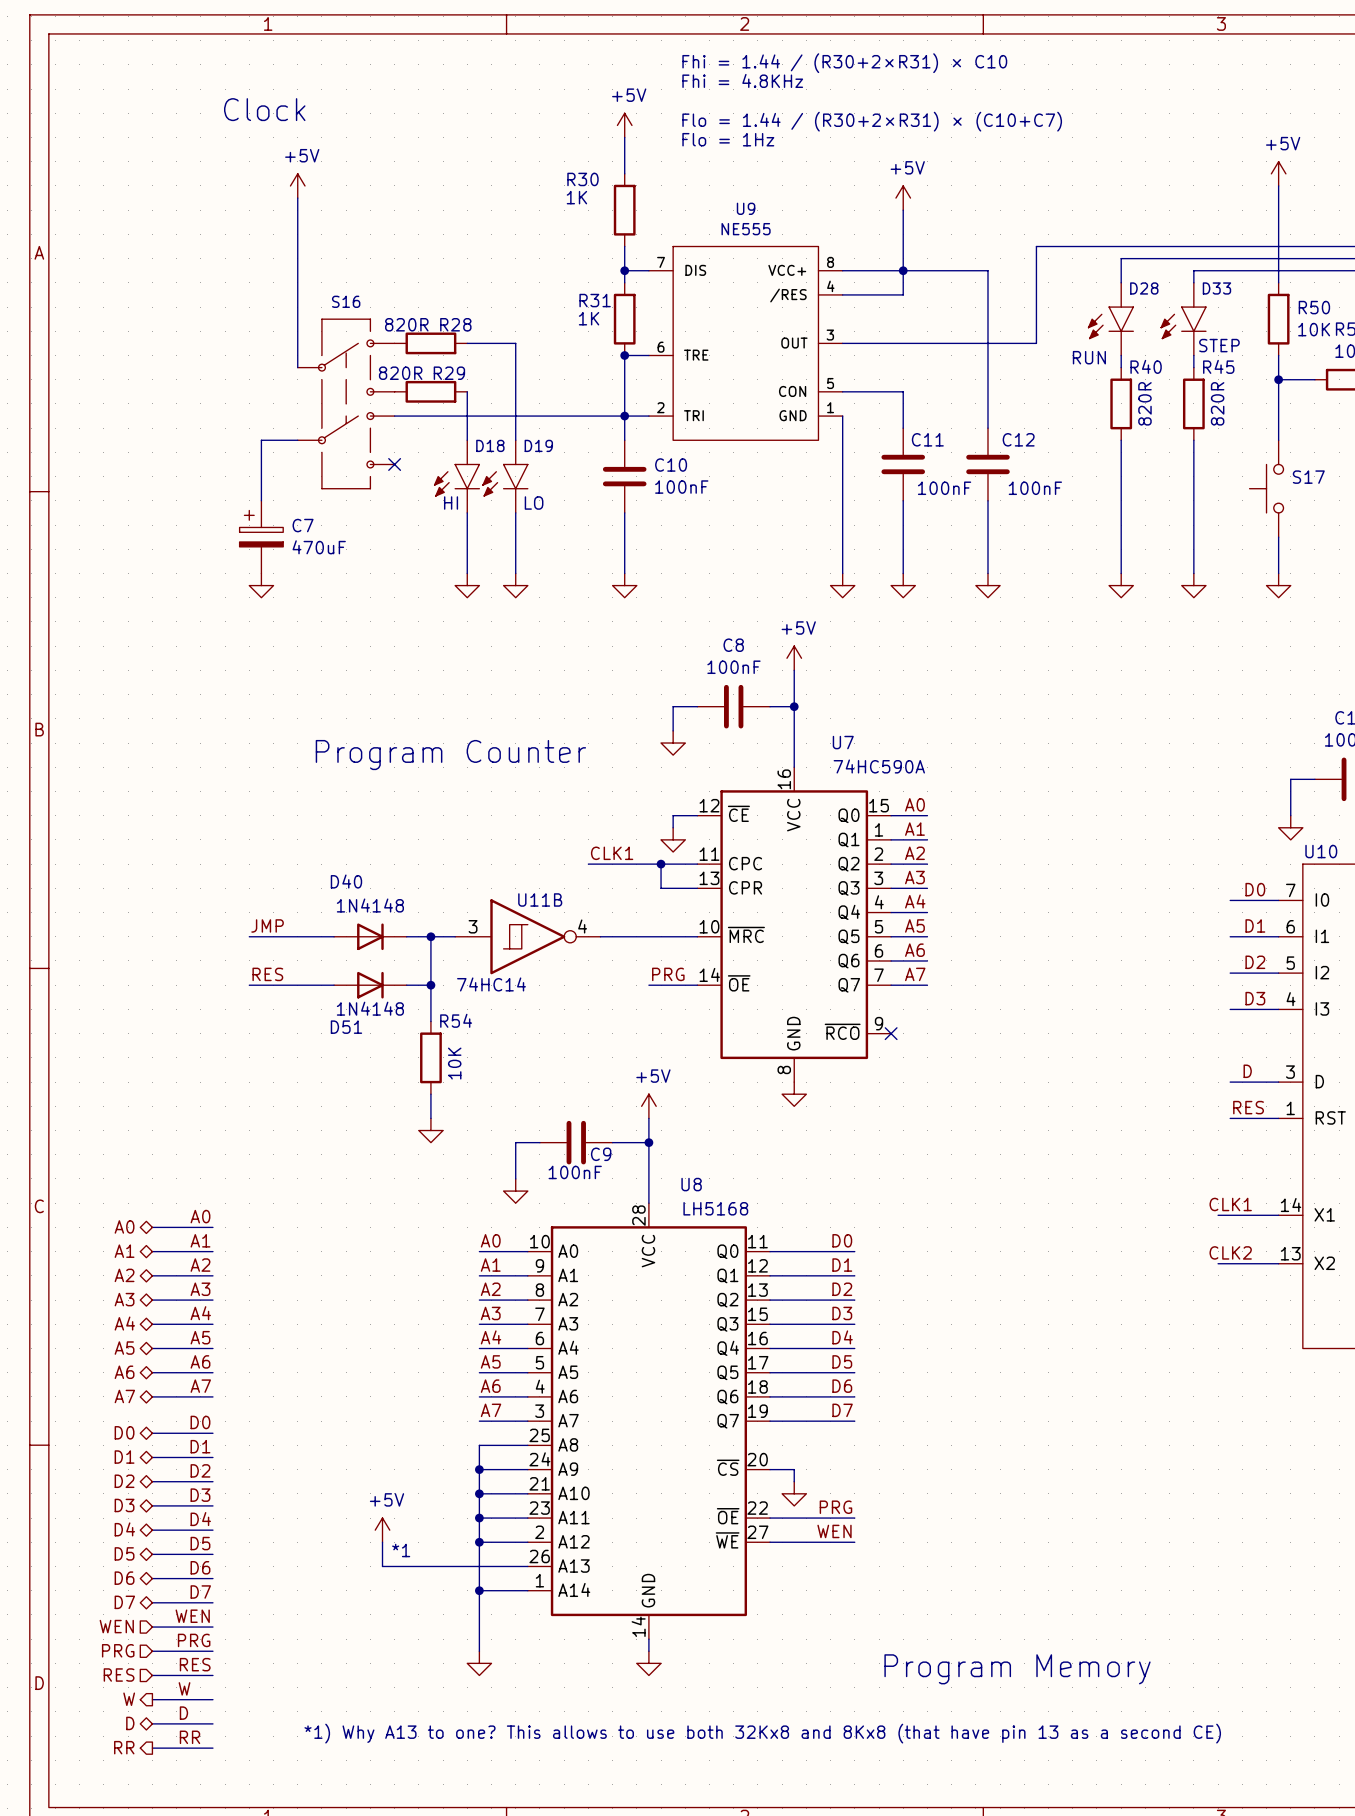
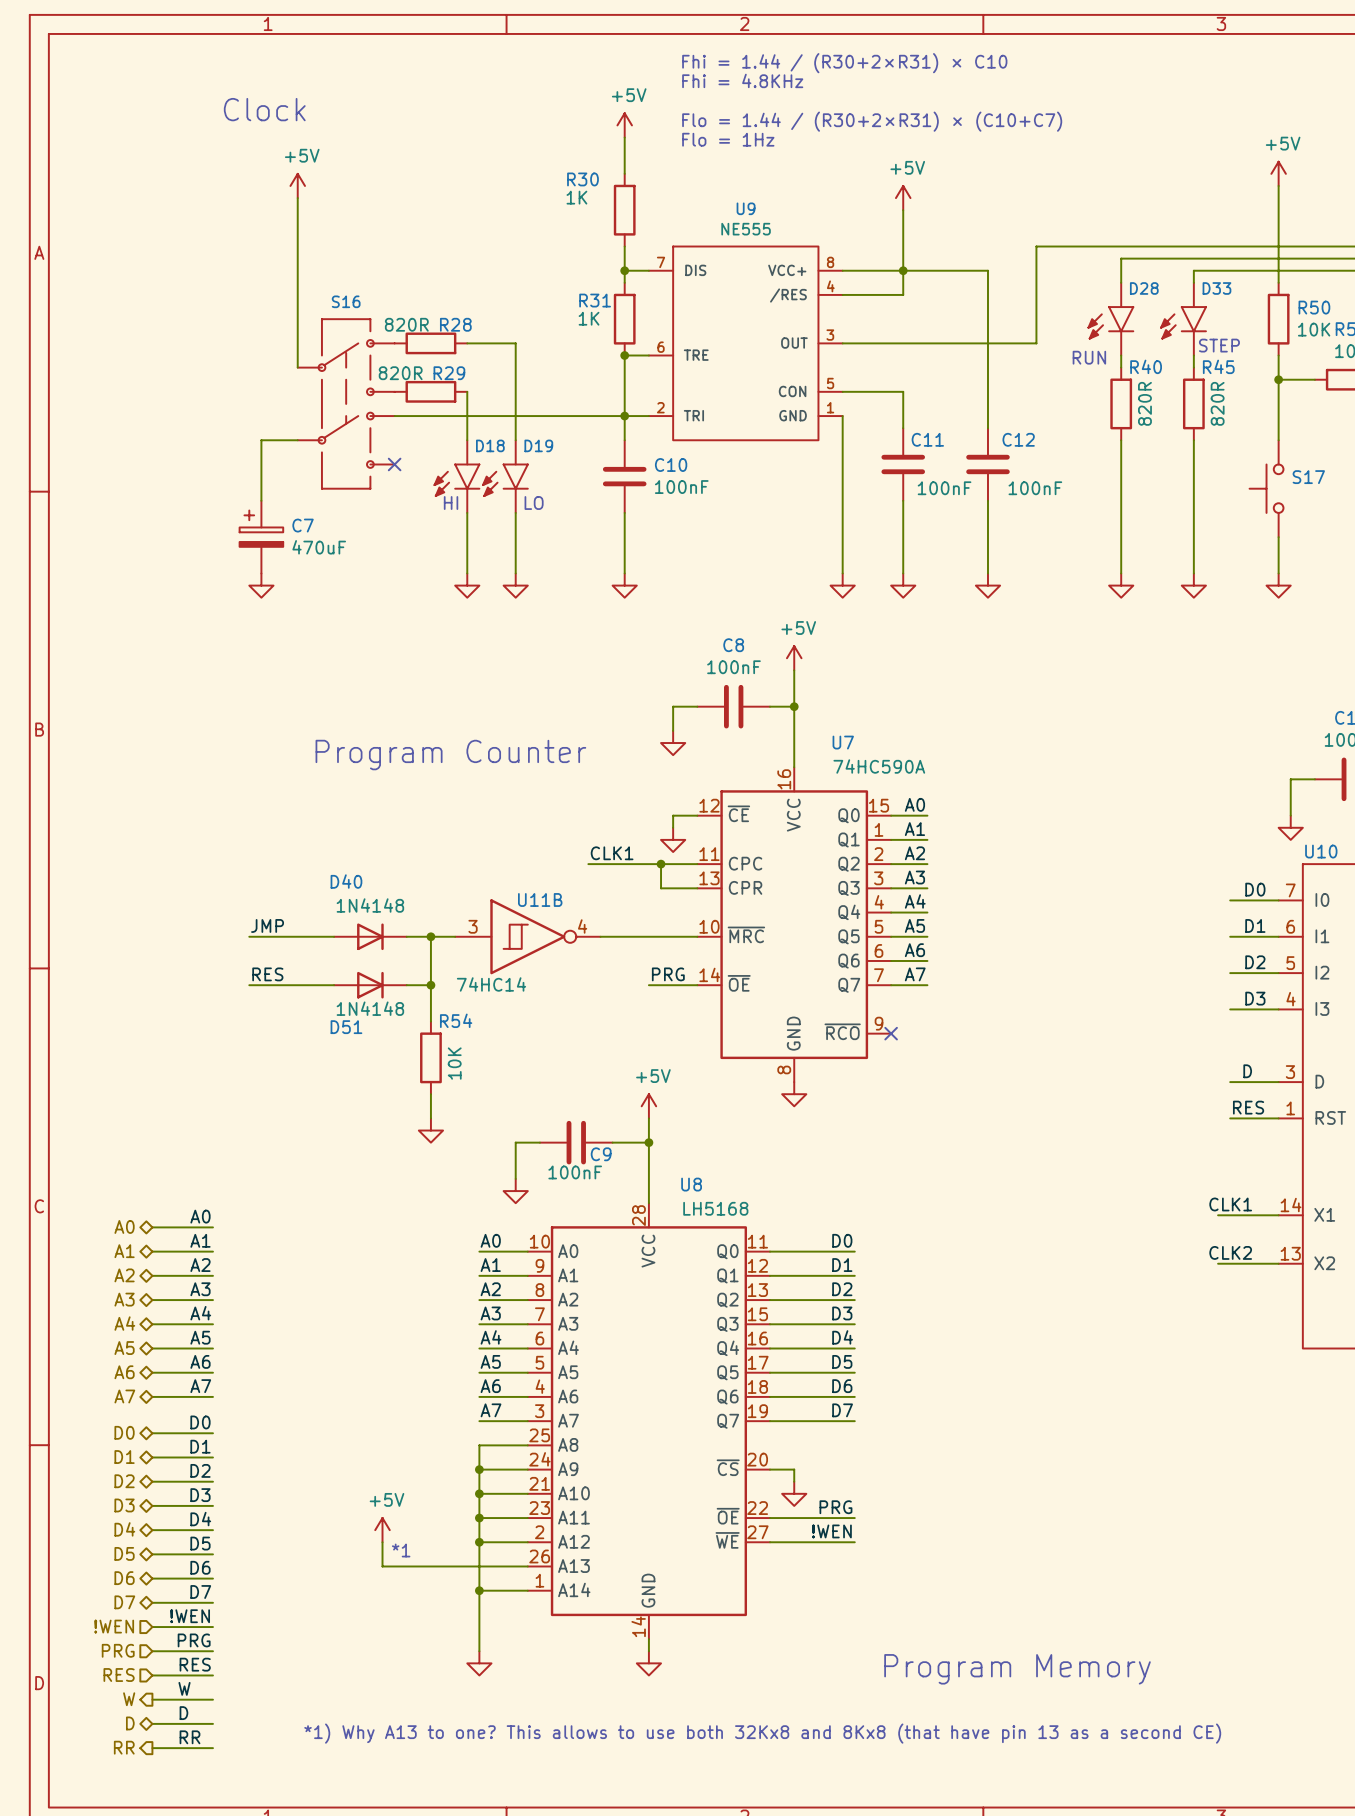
label: WEN (834, 1531) -> !WEN (831, 1531)
label: WEN (192, 1616) -> !WEN (190, 1616)
hierarchical label: WEN (116, 1626) -> !WEN (114, 1626)

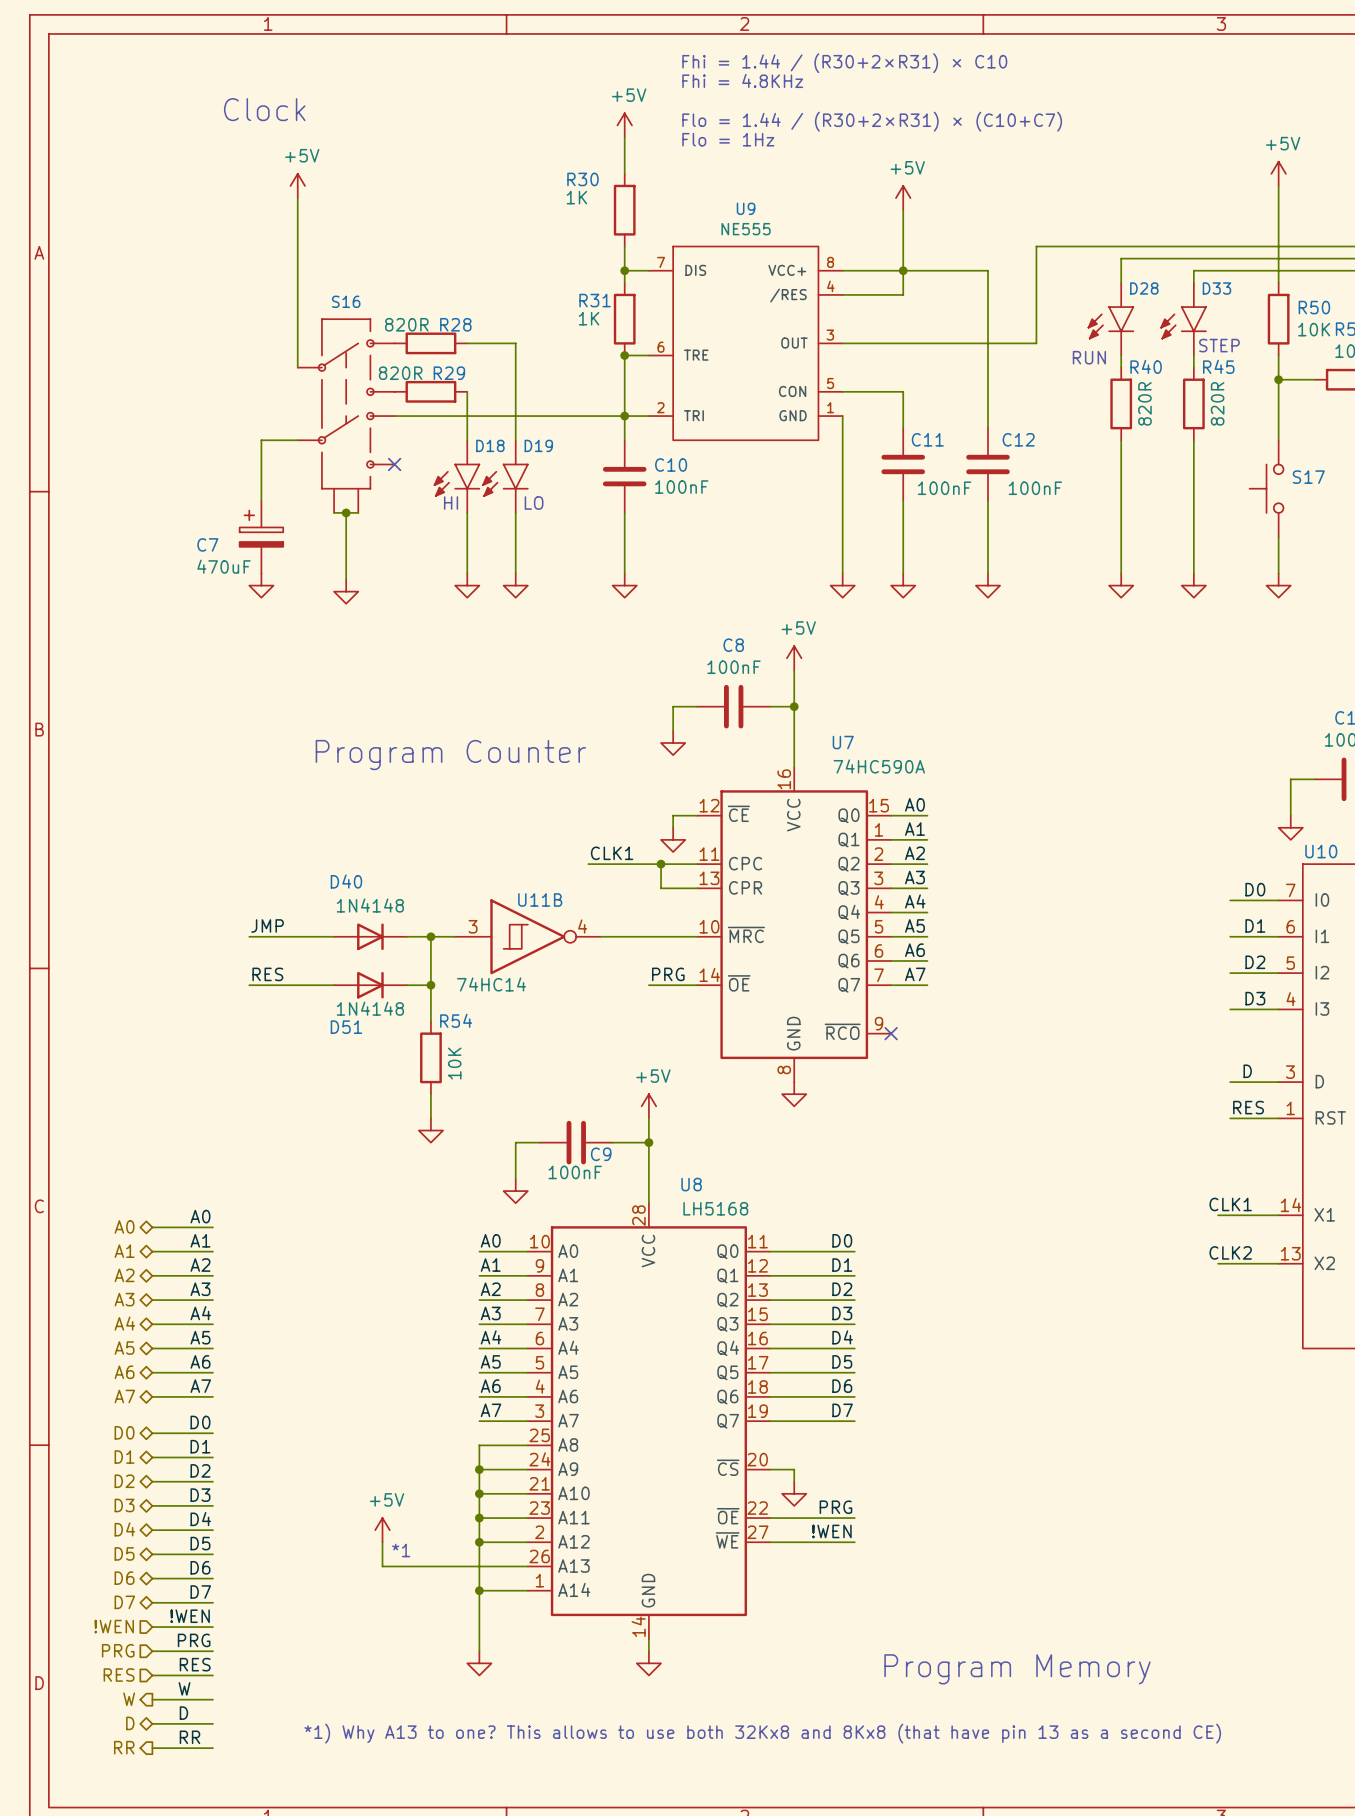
S16 symbol: [297, 319, 395, 489] -> [297, 319, 395, 513]
wire: none -> (334, 512) (358, 512)
wire: none -> (346, 512) (346, 579)
junction: none -> (346, 512)
C7 name position: C7 (303, 525) -> C7 (207, 544)
C7 value position: 470uF (319, 547) -> 470uF (224, 566)
power symbol: none -> (346, 591)

